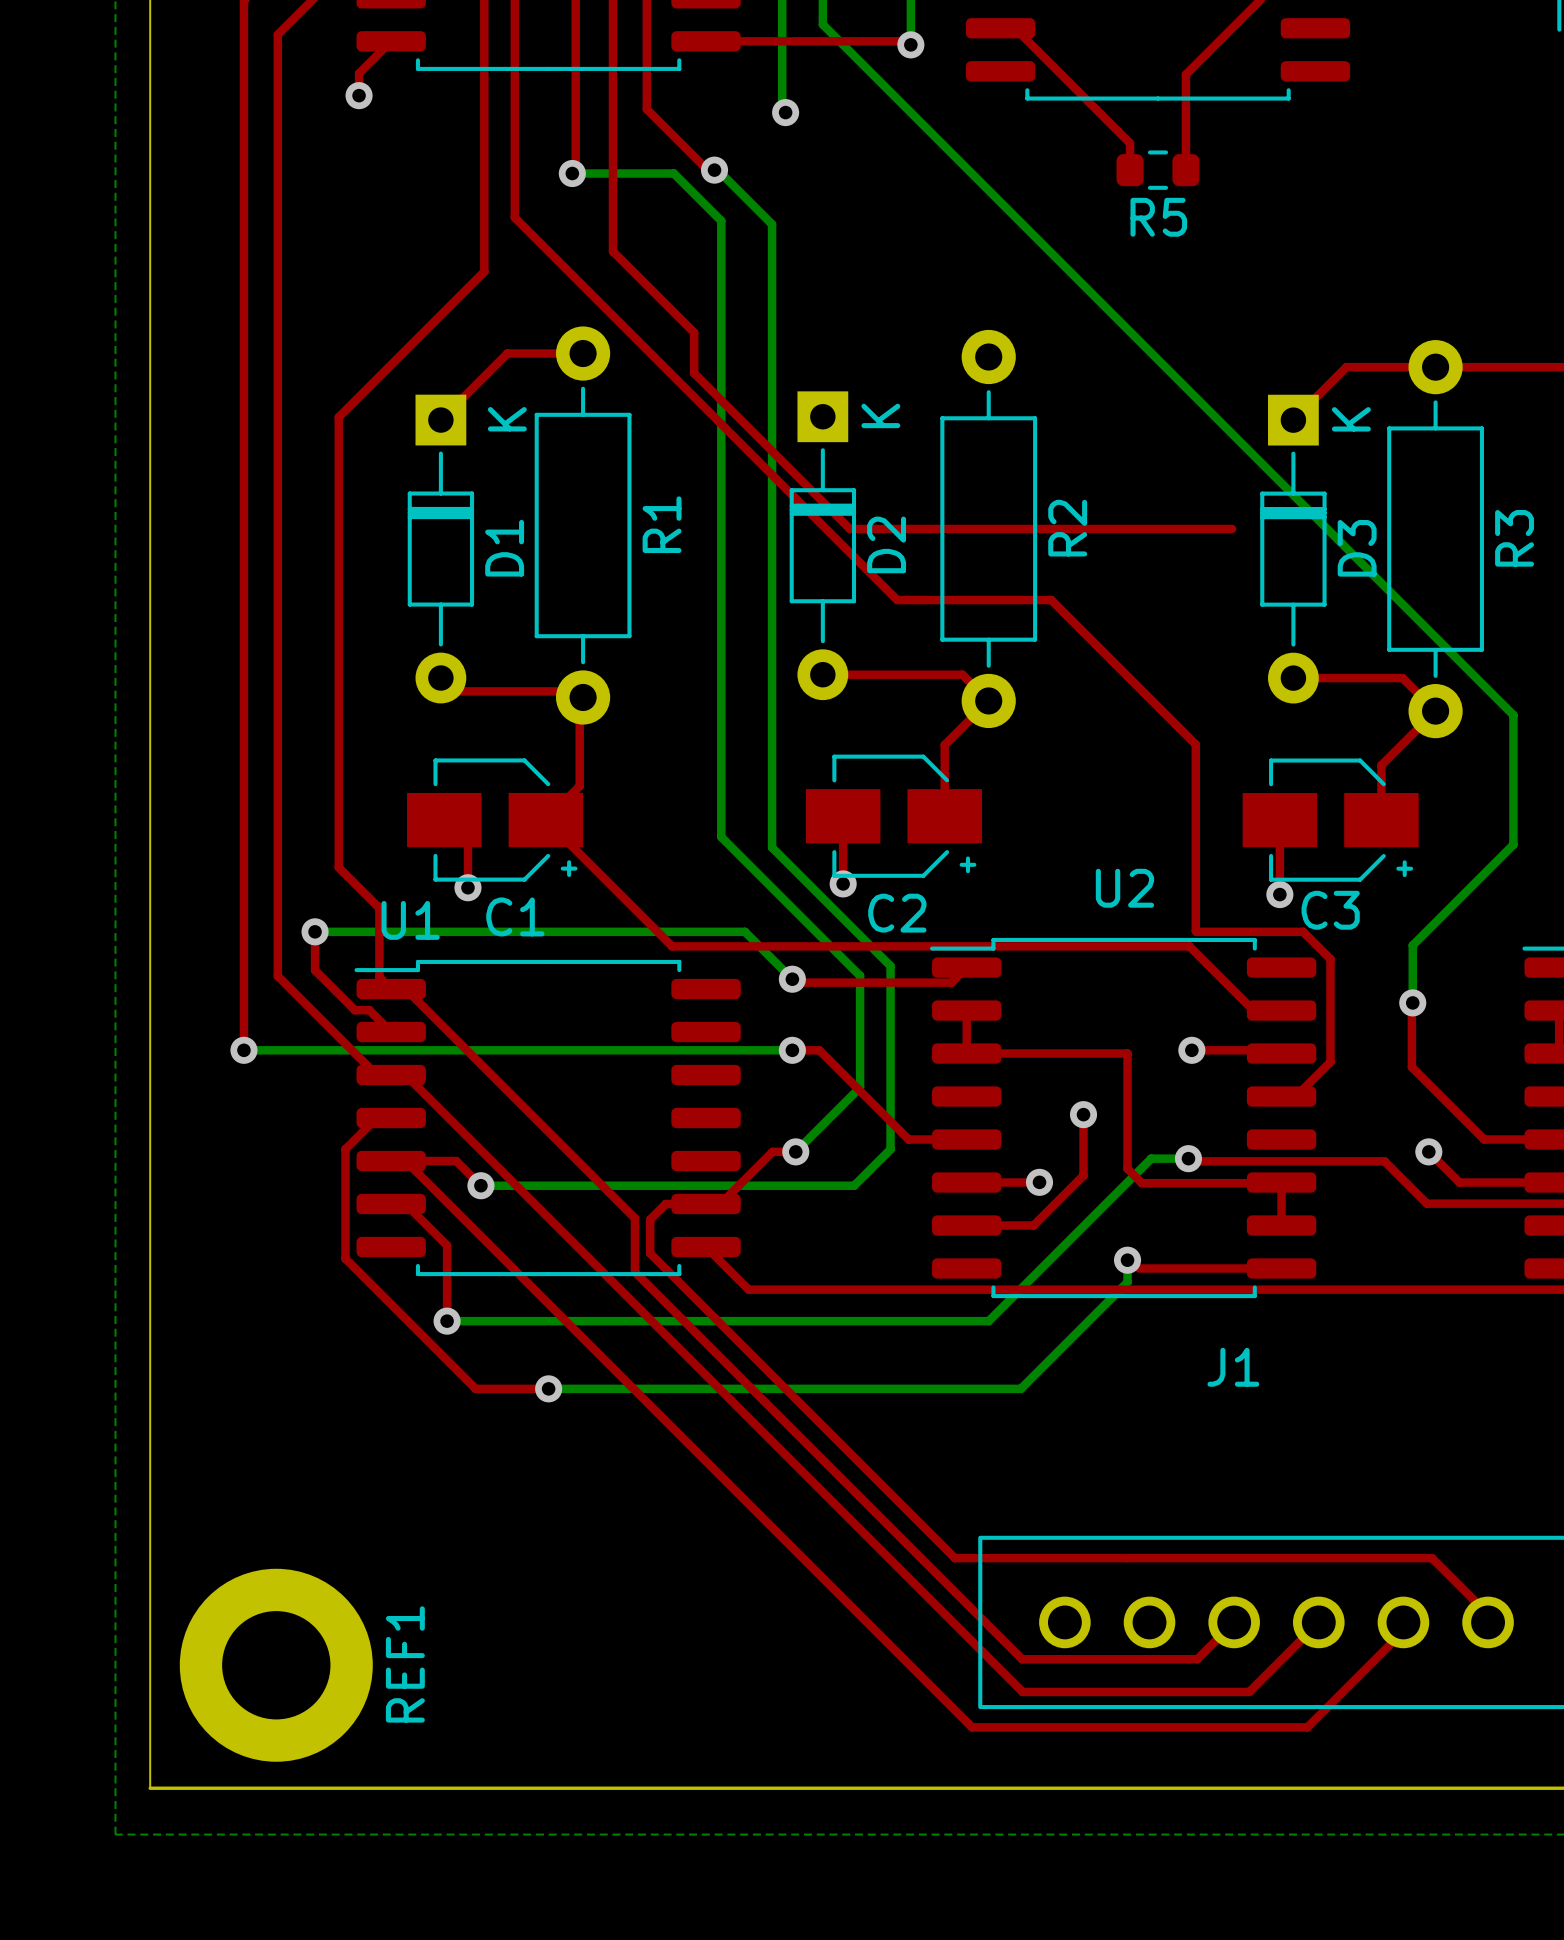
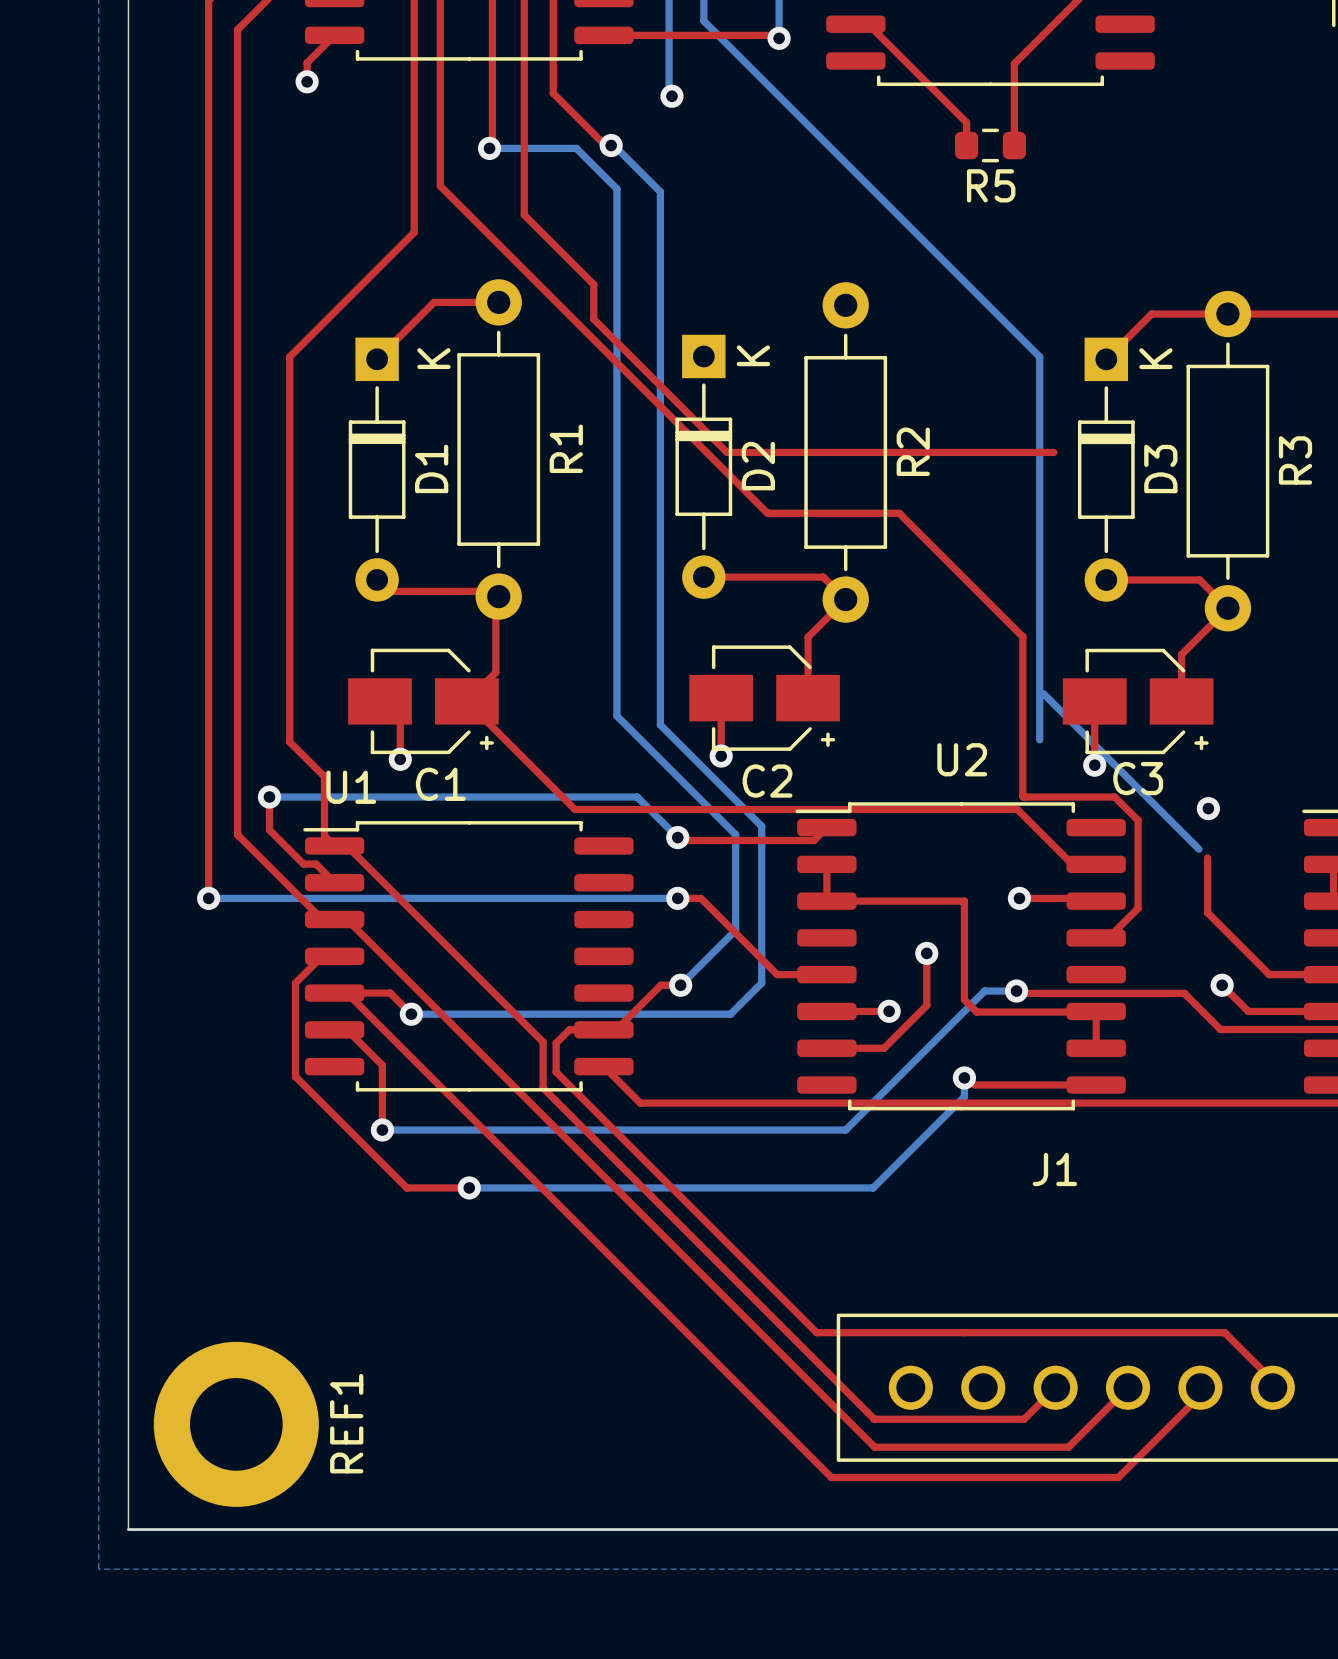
bottom track: (1215, 417) (1513, 715) (1513, 844) (1412, 945) (1412, 1002) -> (1039, 356) (1039, 739)
bottom track: none -> (1043, 693) (1198, 849)
via position: (1412, 1002) -> (1208, 808)

